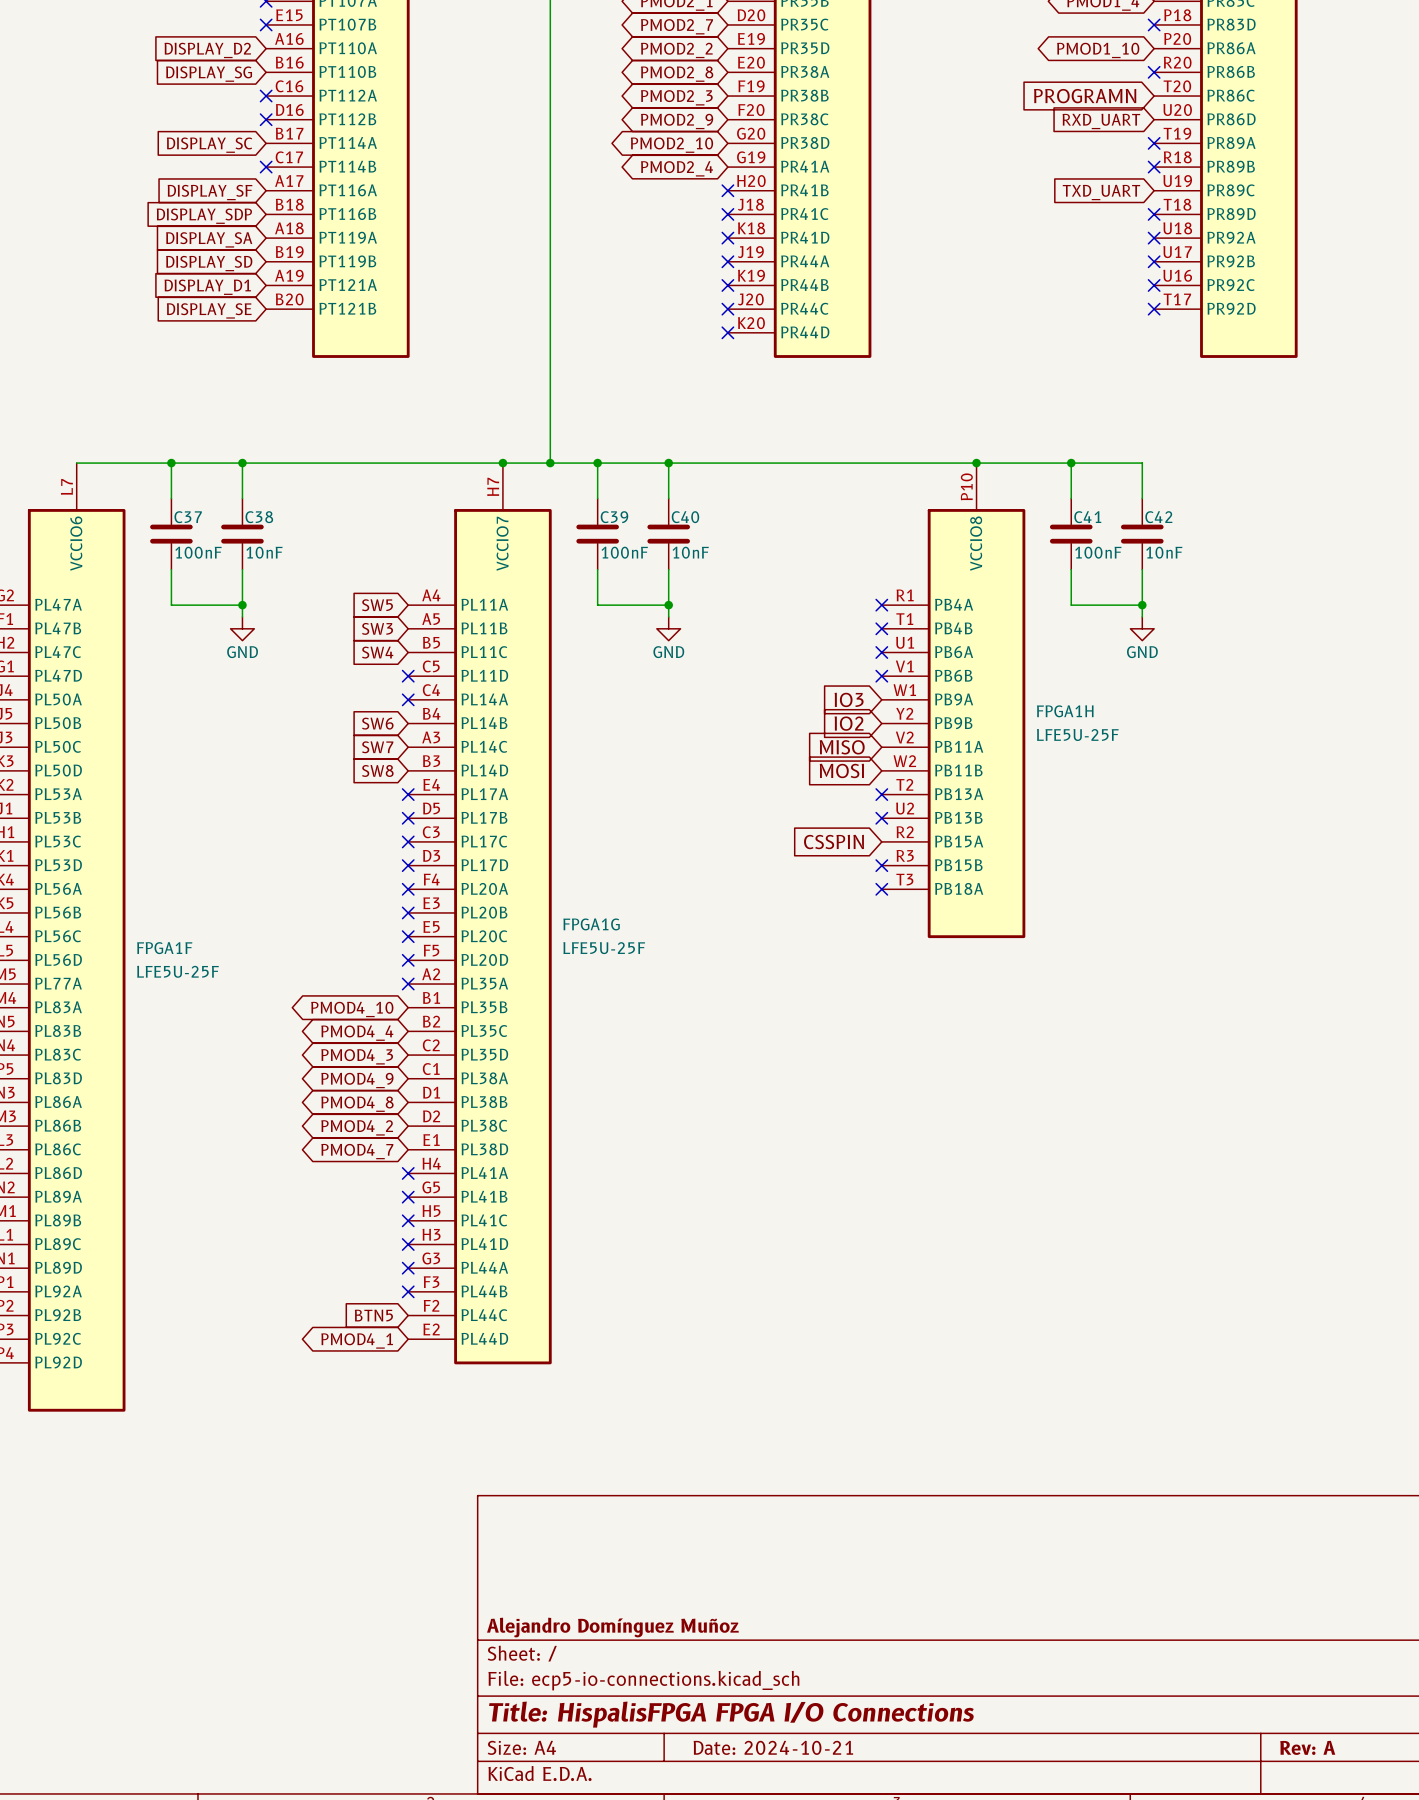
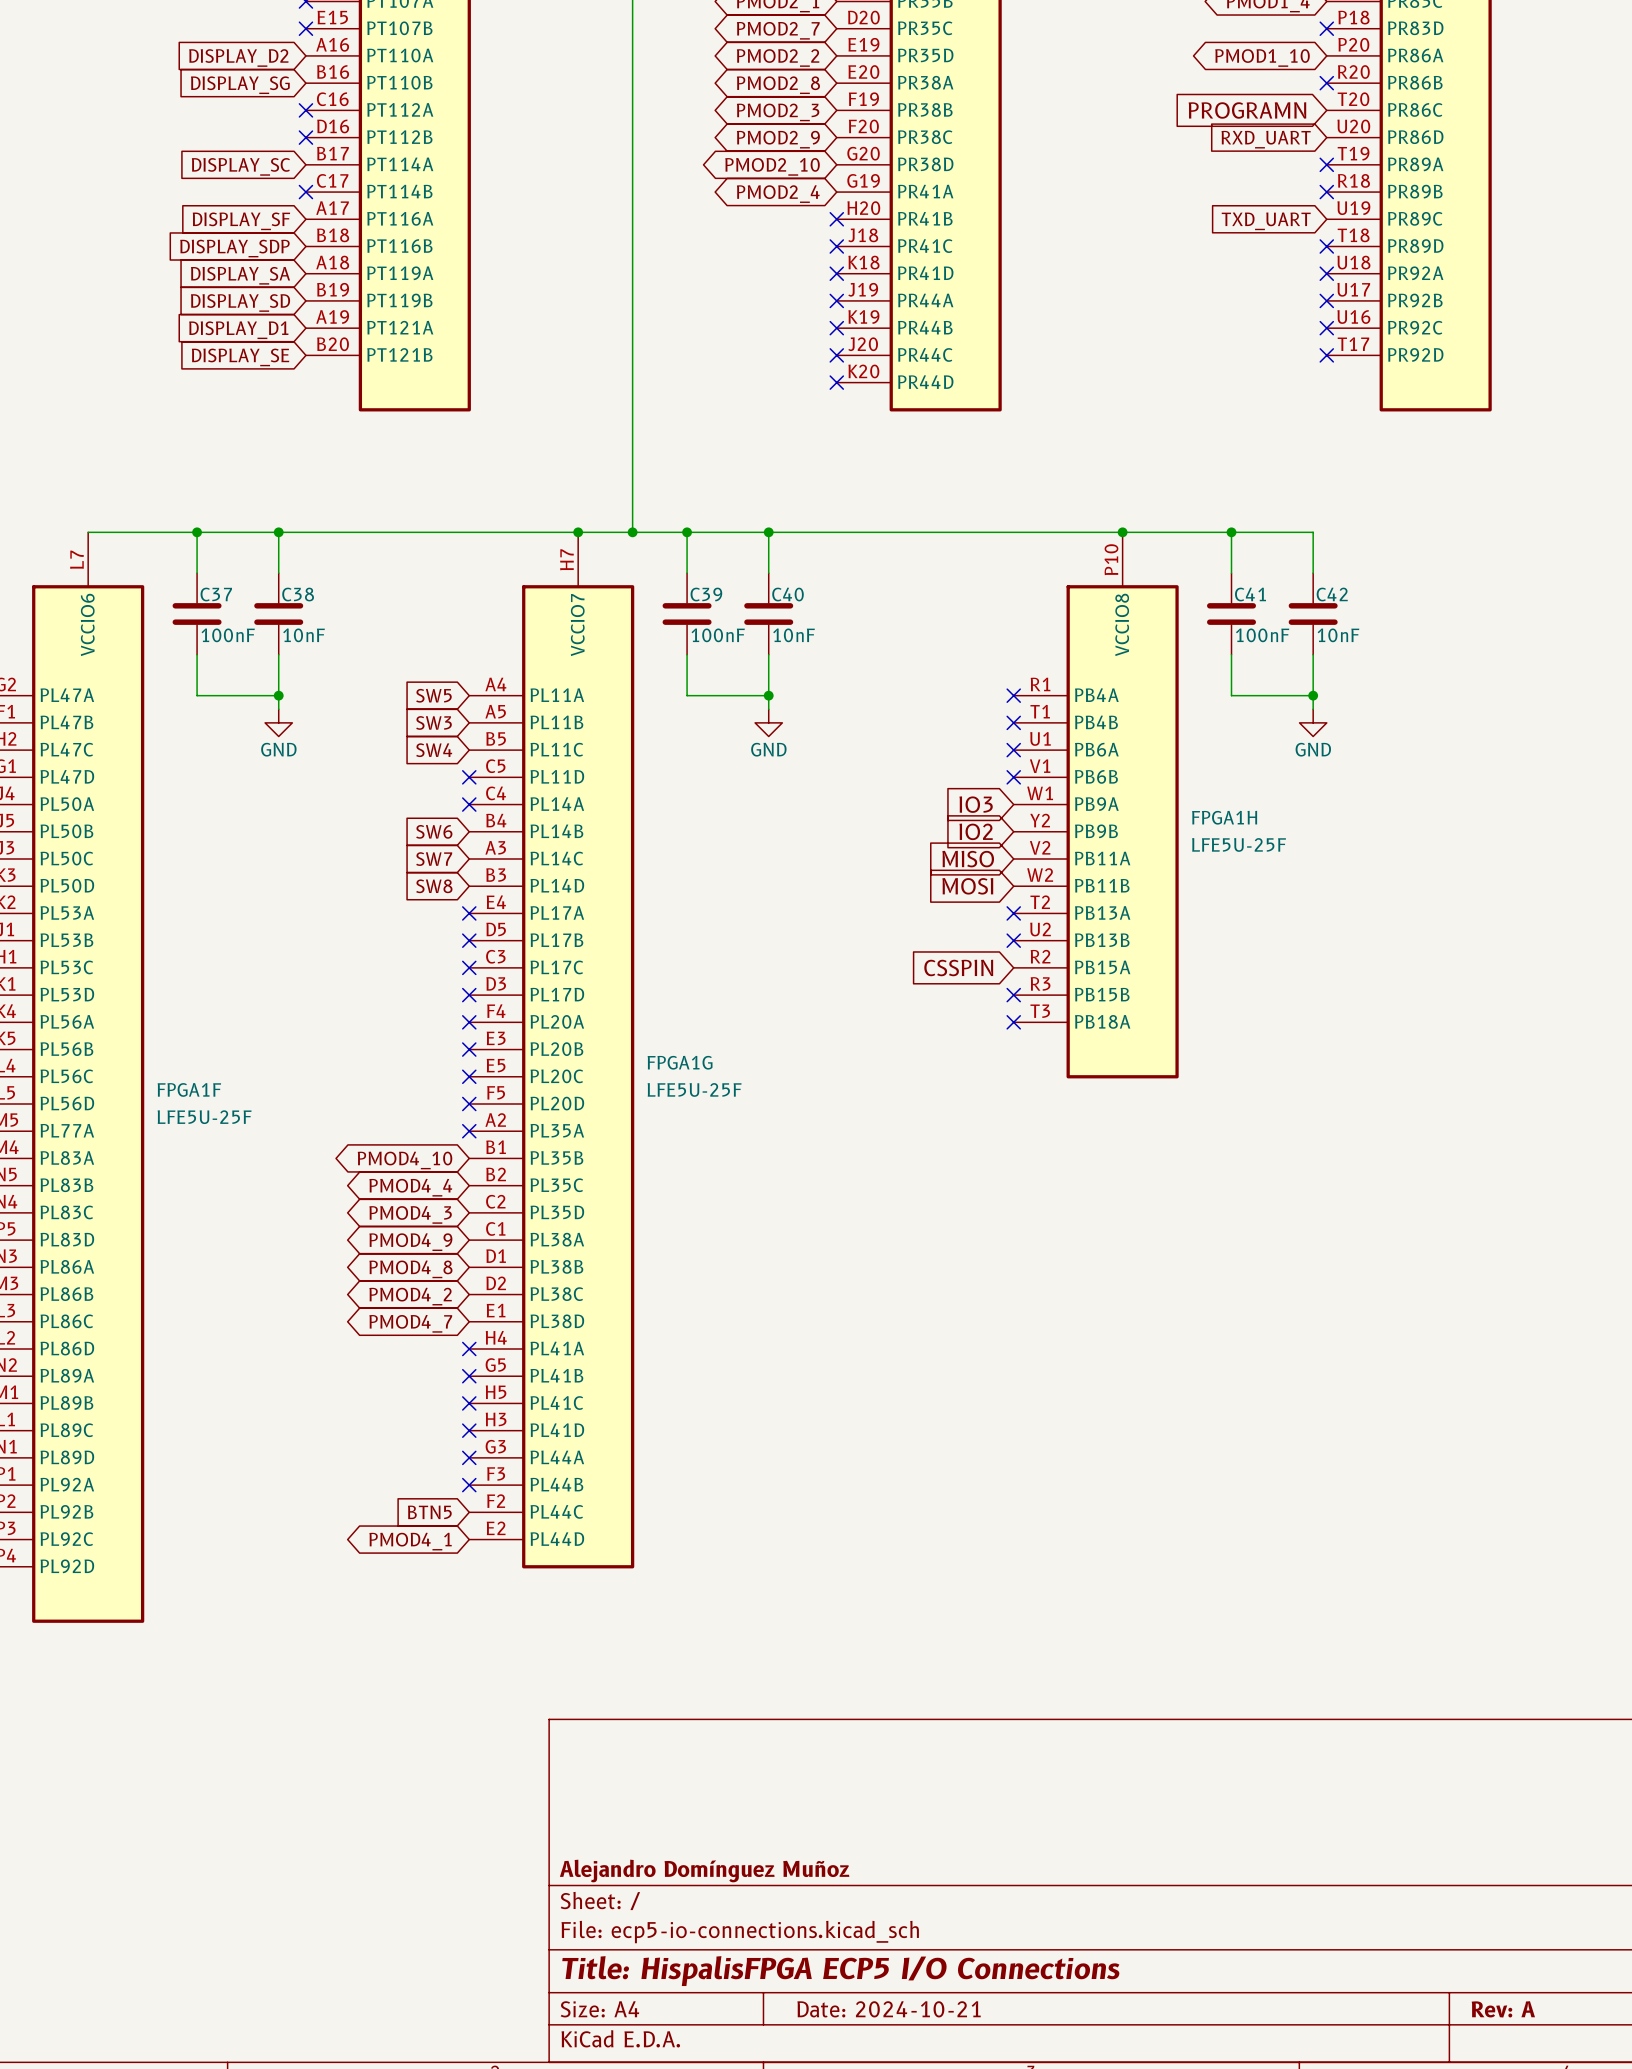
title block: Title: HispalisFPGA FPGA I/O Connections (731, 1714) -> Title: HispalisFPGA ECP5 I/O Connections (840, 1971)

